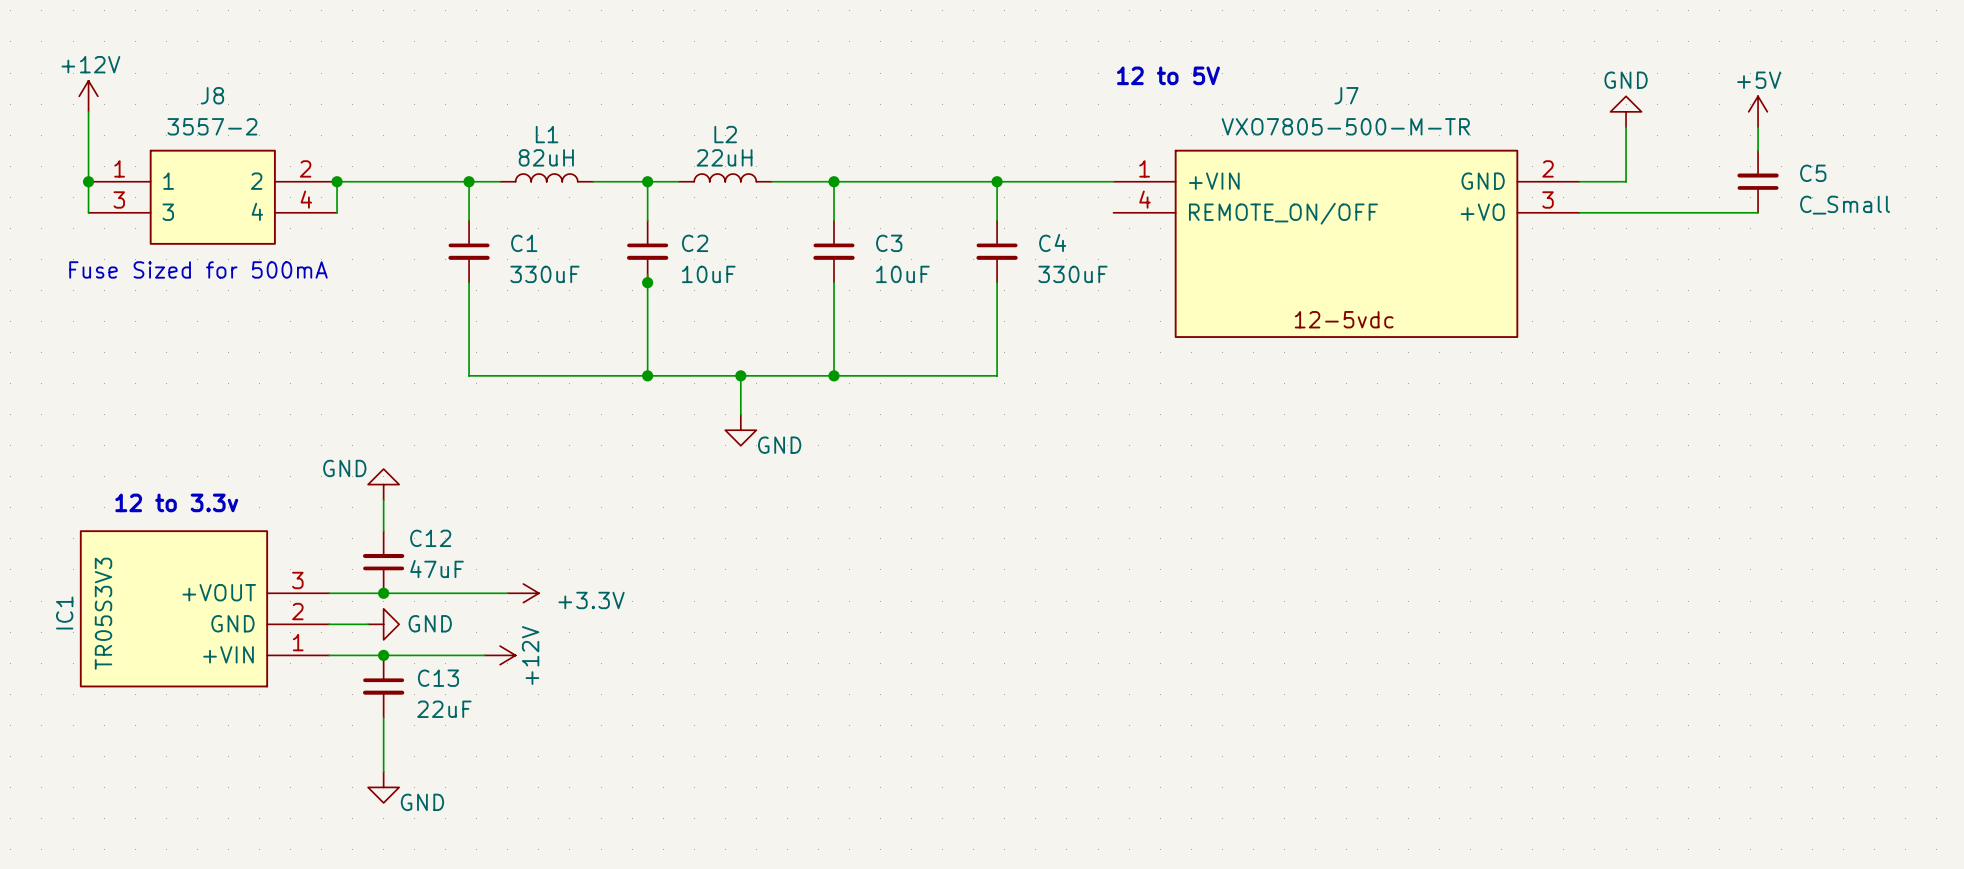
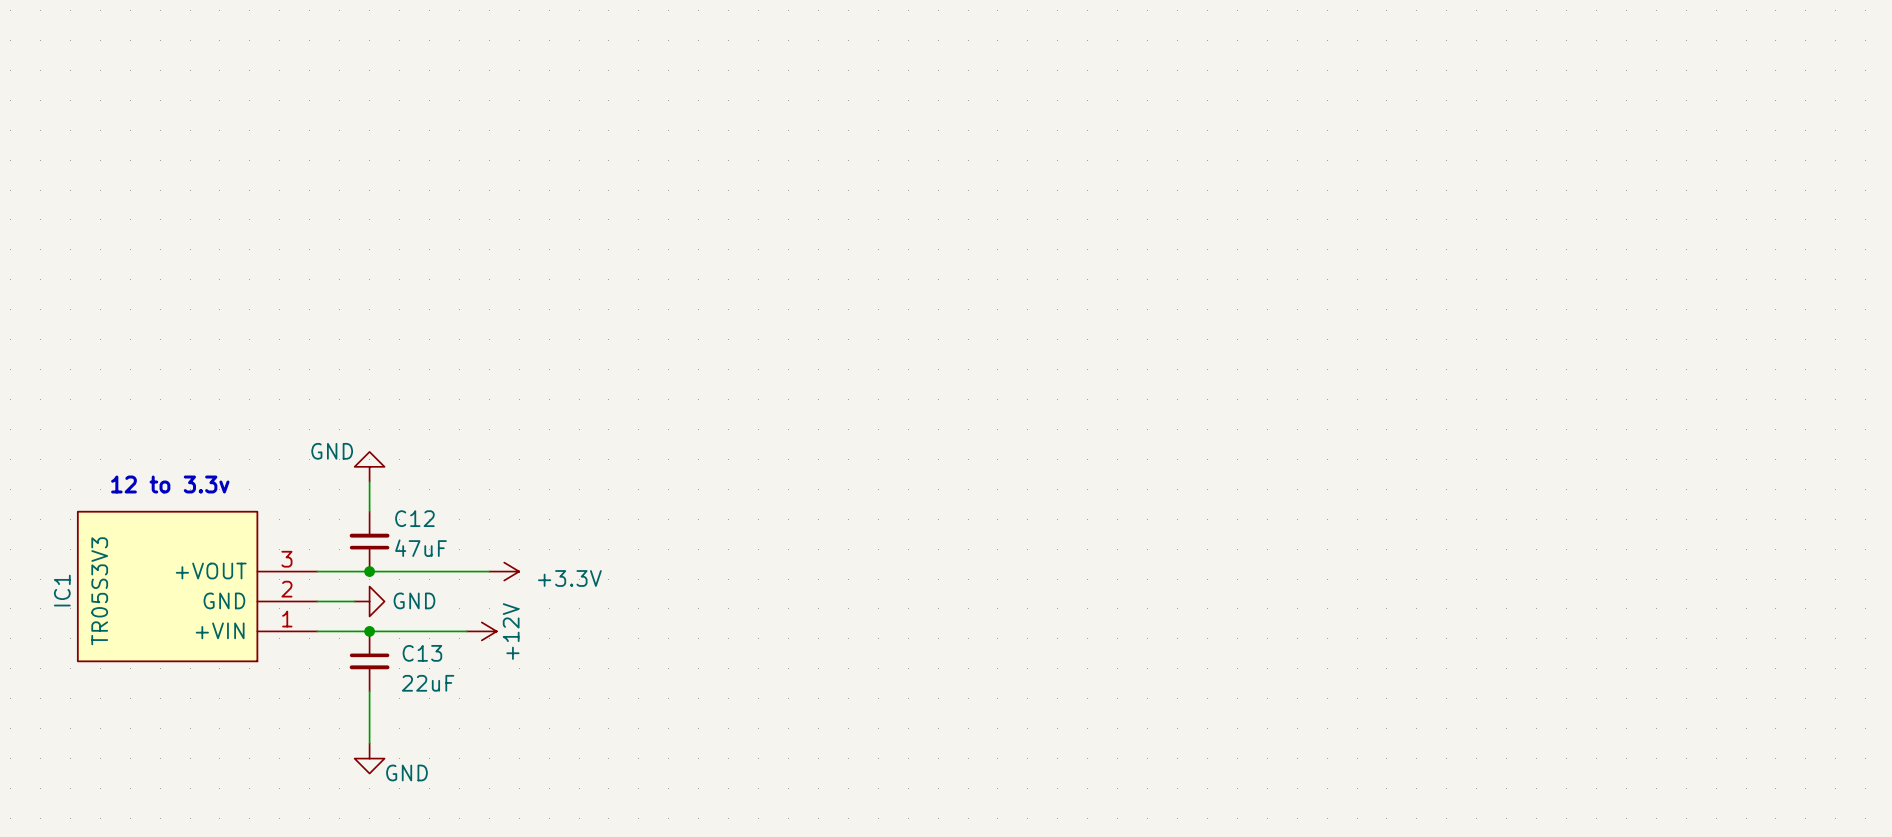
text: 12 to 5V (1168, 75) -> none
power symbol: +12V (88, 96) -> none
wire: (88, 111) (88, 212) -> none
power symbol: GND (1626, 111) -> none
power symbol: +5V (1758, 111) -> none
wire: (1626, 127) (1626, 181) (1579, 181) -> none
wire: (1758, 127) (1758, 150) -> none
L1: 82uH (546, 177) -> none
L2: 22uH (725, 177) -> none
junction: (88, 181) -> none
junction: (337, 181) -> none
wire: (469, 181) (469, 220) -> none
junction: (469, 181) -> none
wire: (500, 181) (337, 181) (337, 212) -> none
wire: (593, 181) (678, 181) -> none
wire: (647, 181) (647, 220) -> none
junction: (647, 181) -> none
wire: (771, 181) (1113, 181) -> none
wire: (834, 181) (834, 220) -> none
junction: (834, 181) -> none
wire: (997, 181) (997, 220) -> none
junction: (997, 181) -> none
C5: C_Small (1758, 181) -> none
J8: 3557-2 (212, 197) -> none
wire: (1579, 212) (1758, 212) -> none
J7: VXO7805-500-M-TR (1346, 243) -> none
C1: 330uF (469, 251) -> none
C2: 10uF (647, 251) -> none
C3: 10uF (834, 251) -> none
C4: 330uF (997, 251) -> none
text: Fuse Sized for 500mA (198, 269) -> none
wire: (647, 274) (647, 375) -> none
wire: (469, 282) (469, 375) (997, 375) (997, 282) -> none
junction: (647, 282) -> none
wire: (834, 282) (834, 375) -> none
junction: (647, 375) -> none
wire: (740, 375) (740, 414) -> none
junction: (740, 375) -> none
junction: (834, 375) -> none
power symbol: GND (740, 430) -> none

